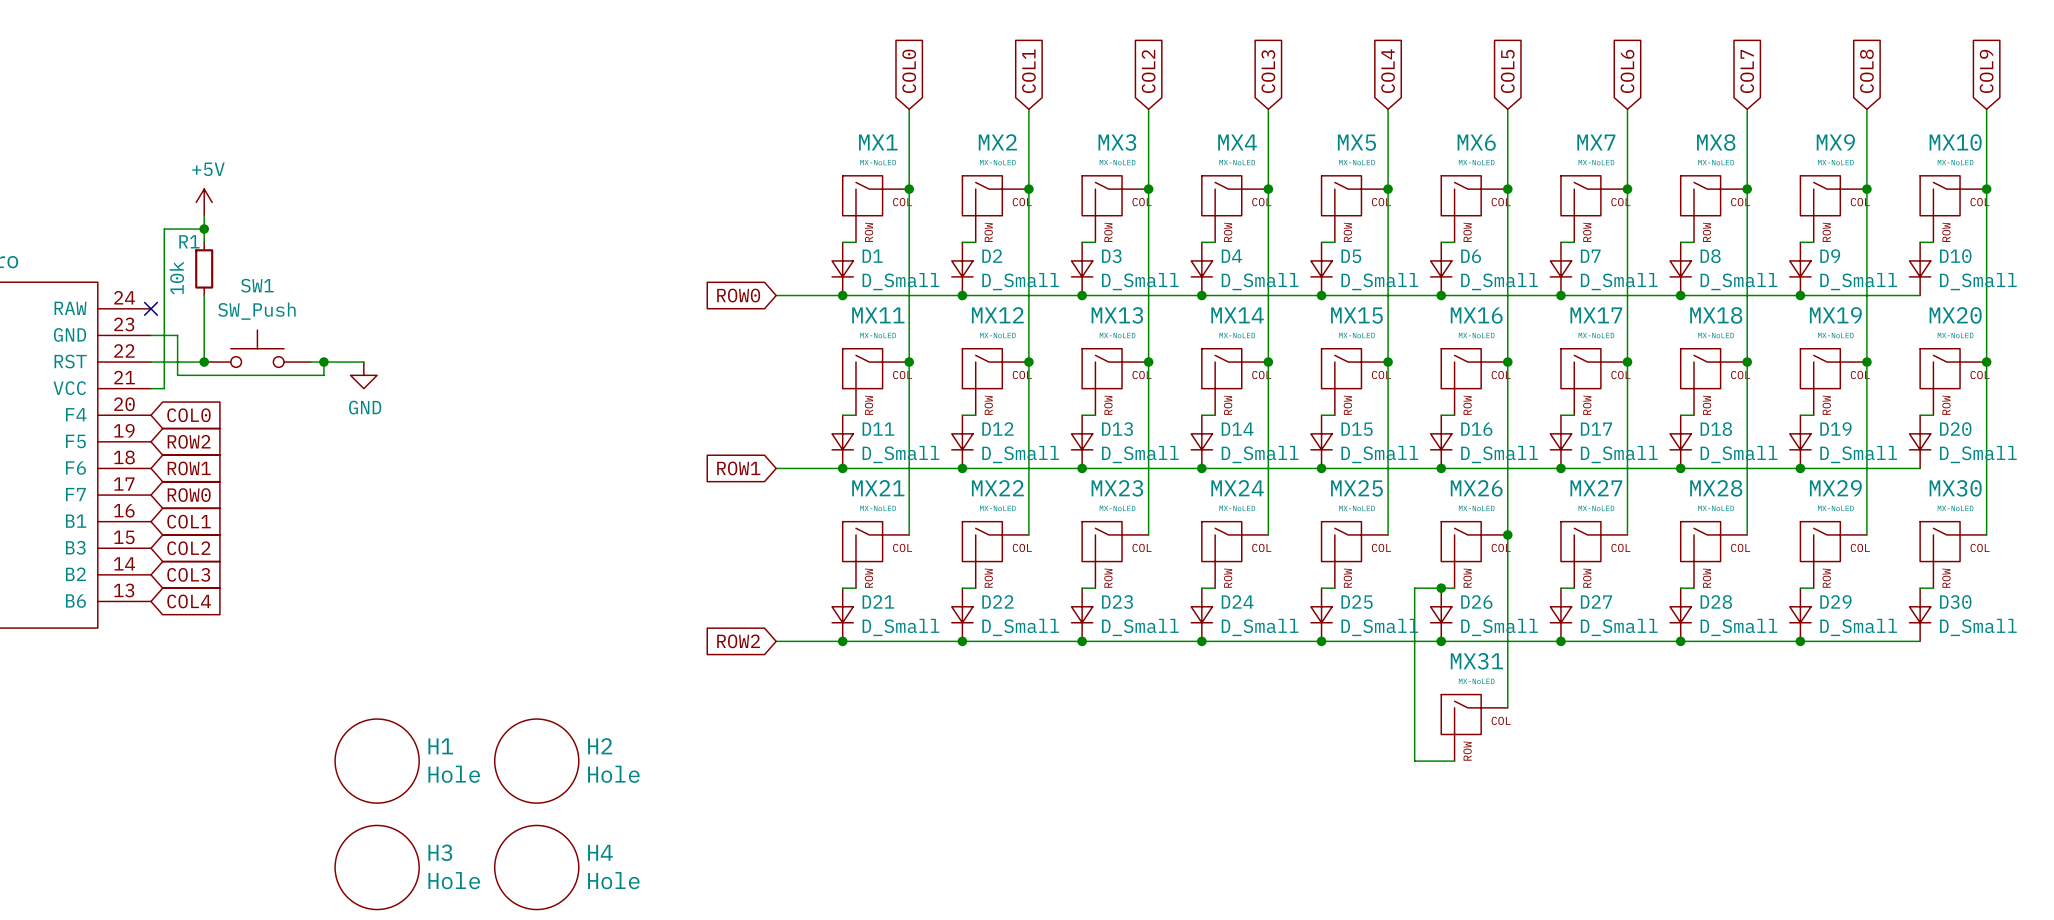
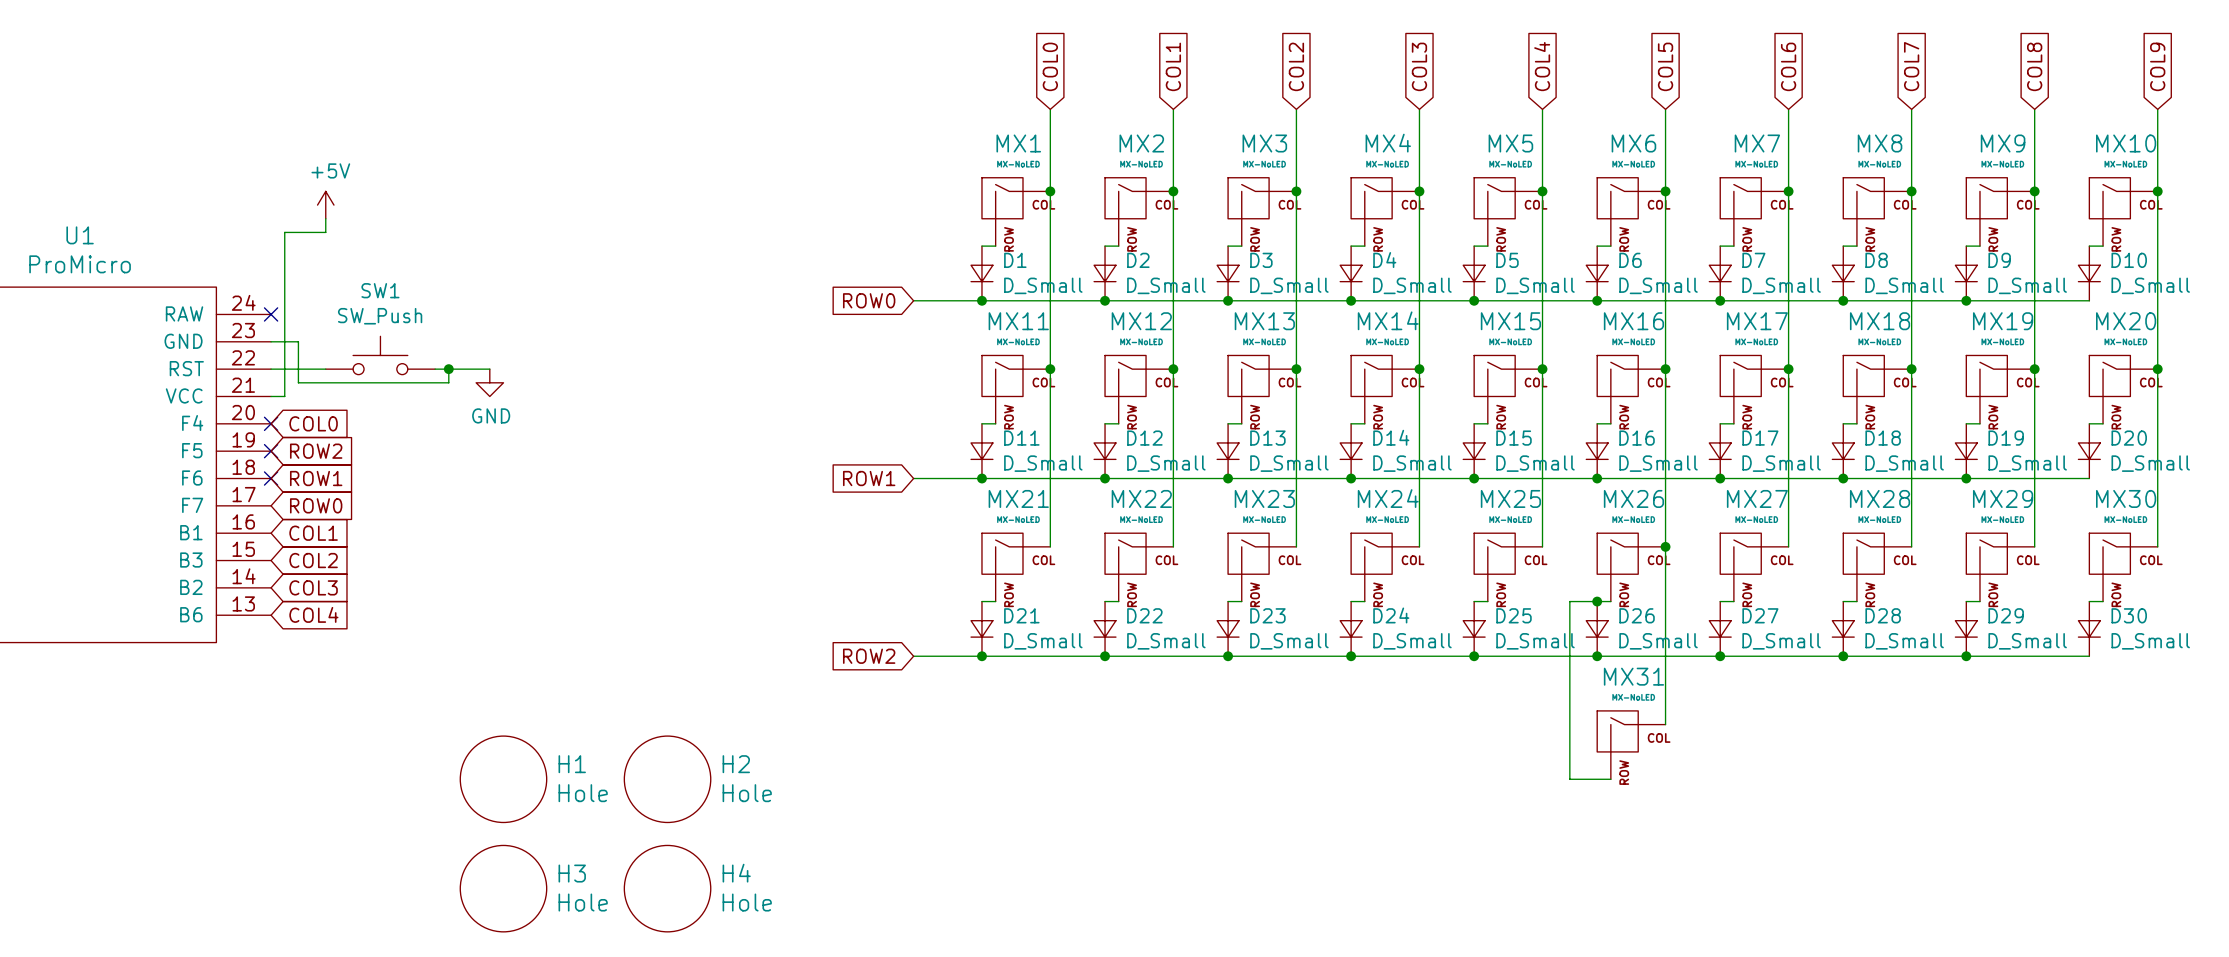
wire: (204, 229) (204, 242) -> none
junction: (204, 229) -> none
R1: 10k (204, 268) -> none
wire: (204, 295) (204, 362) -> none
junction: (204, 362) -> none
no-connect mark: none -> (271, 423)
no-connect mark: none -> (271, 451)
no-connect mark: none -> (271, 478)

